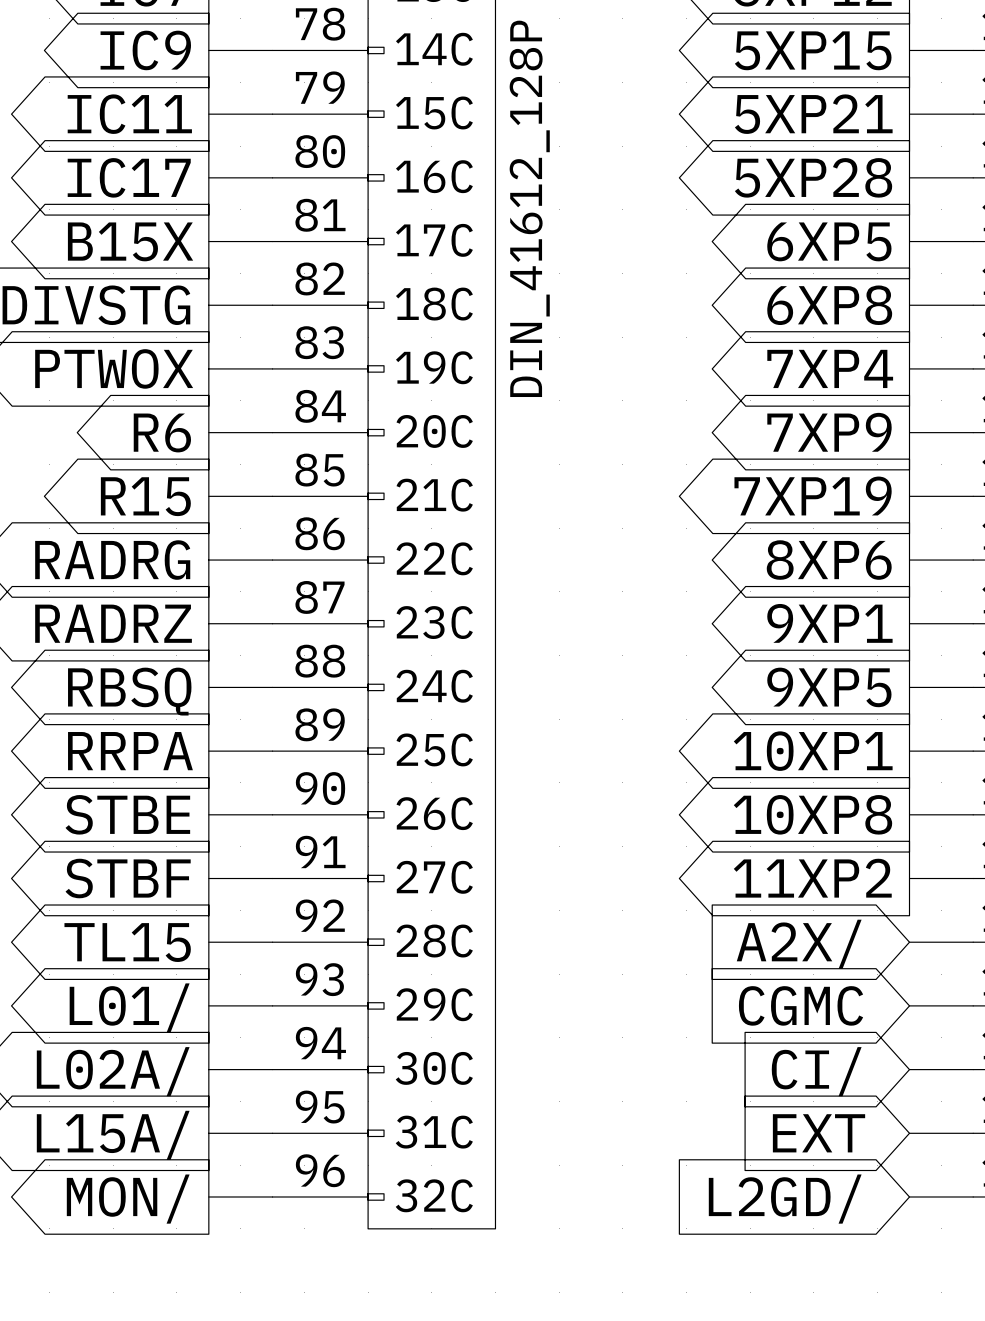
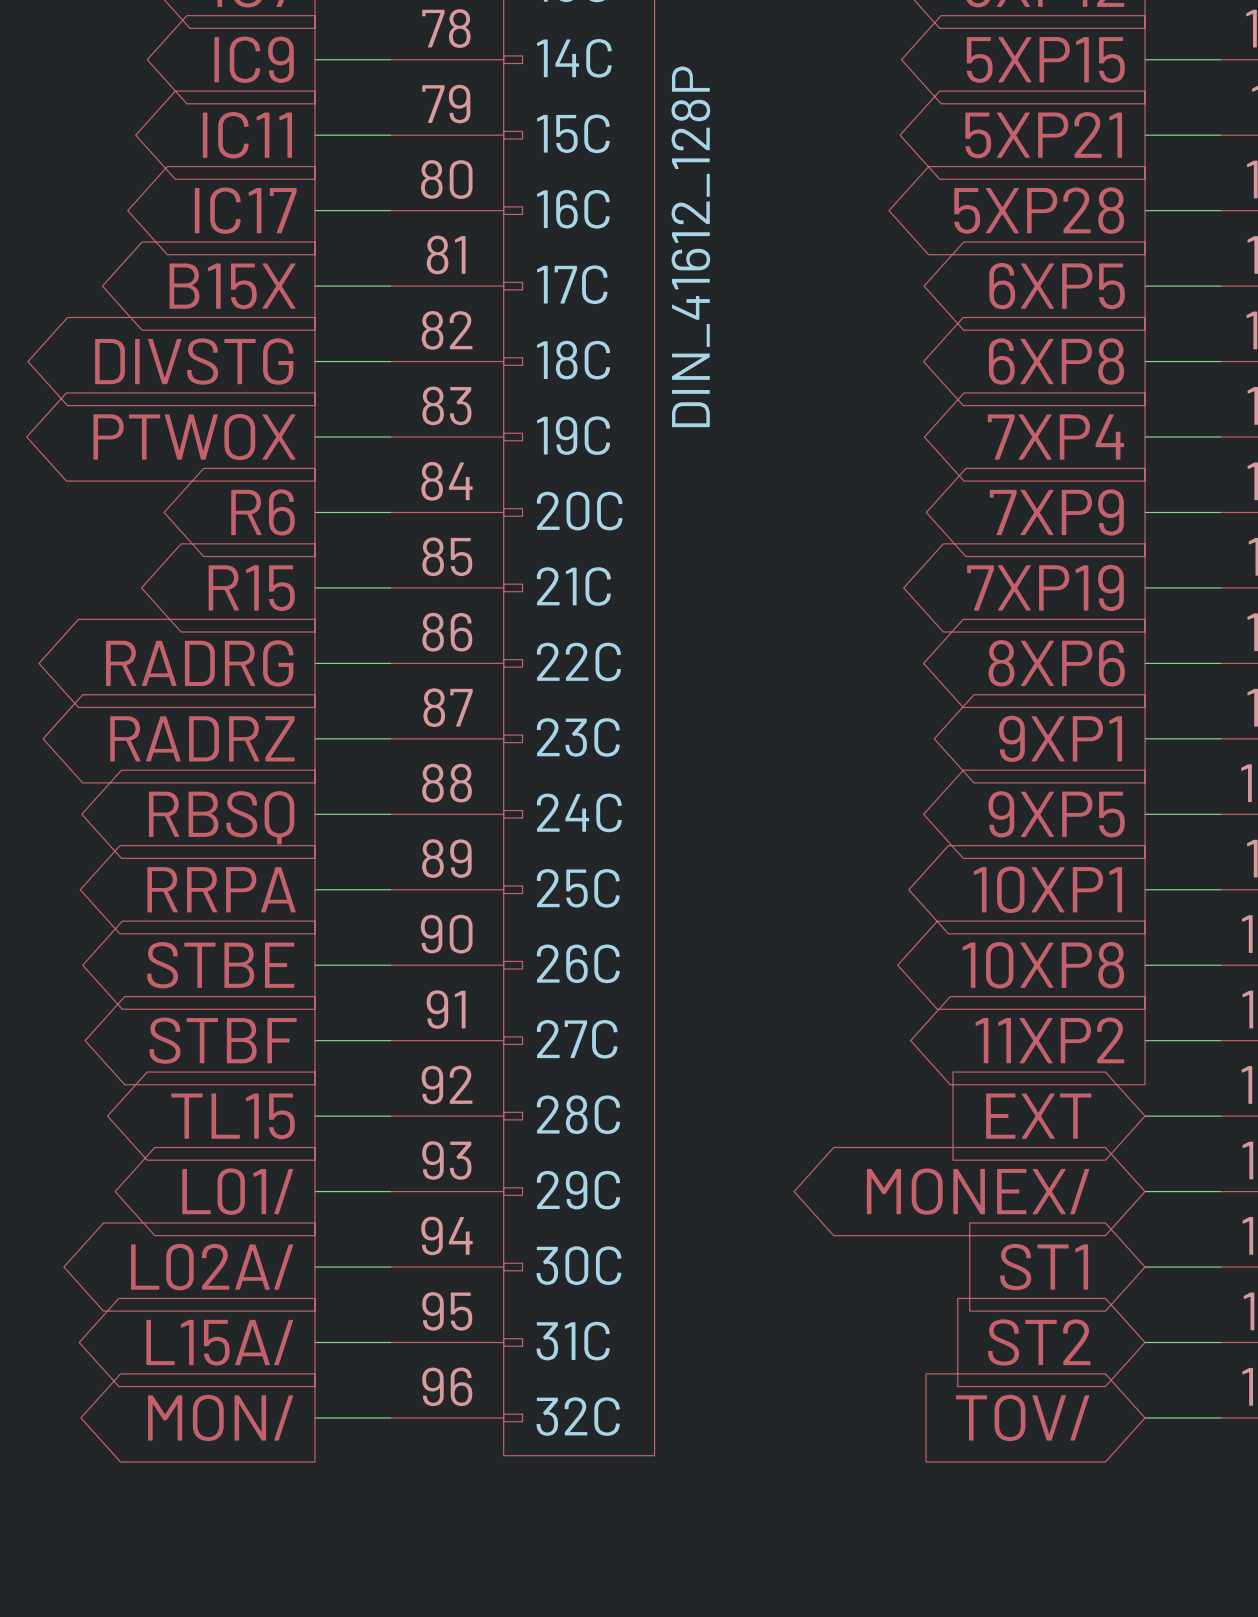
global label: A2X/ (799, 944) -> EXT (1038, 1116)
global label shape: input (801, 1005) -> bidirectional (978, 1191)
global label: CGMC (801, 1005) -> MONEX/ (978, 1191)
global label: CI/ (816, 1071) -> ST1 (1044, 1267)
global label: EXT (819, 1133) -> ST2 (1039, 1342)
global label: L2GD/ (785, 1199) -> TOV/ (1022, 1417)

